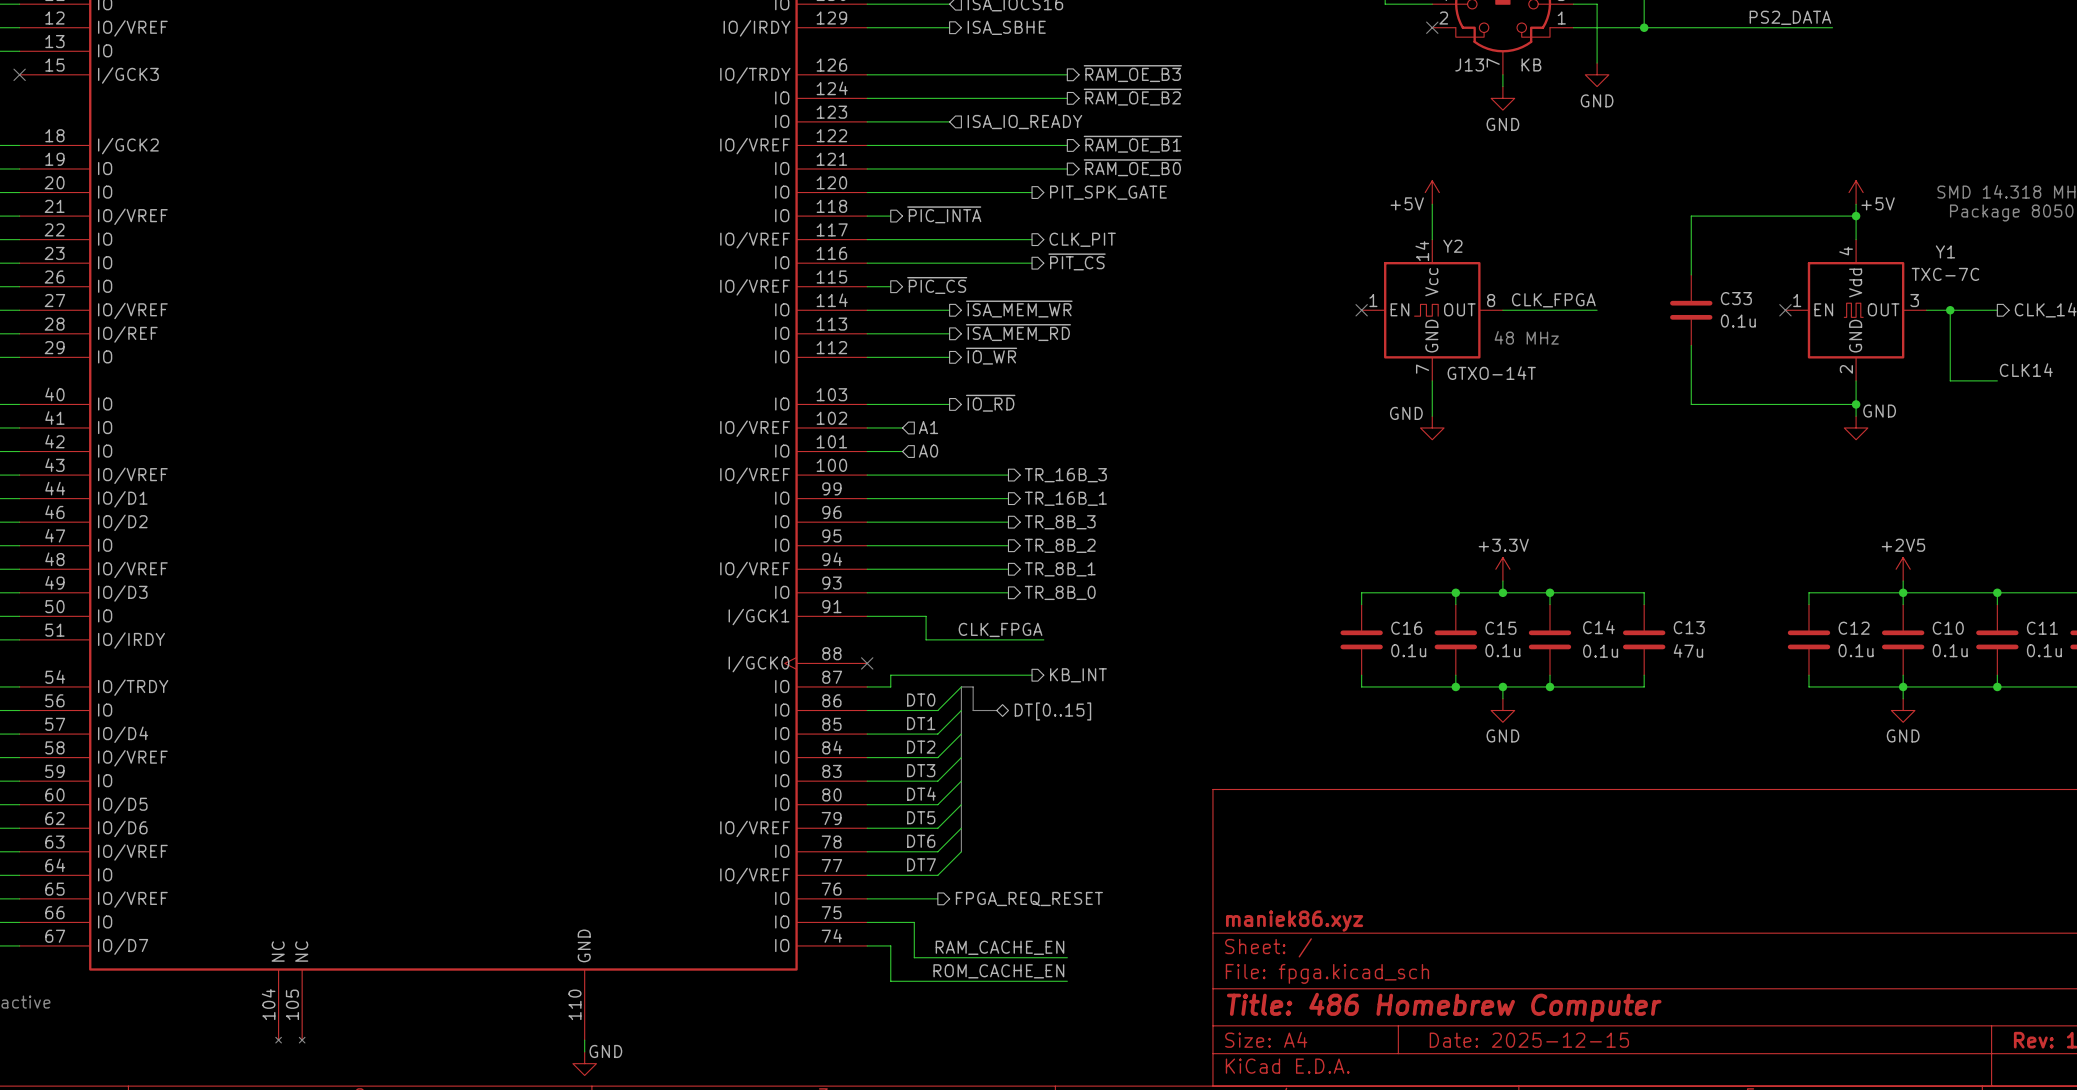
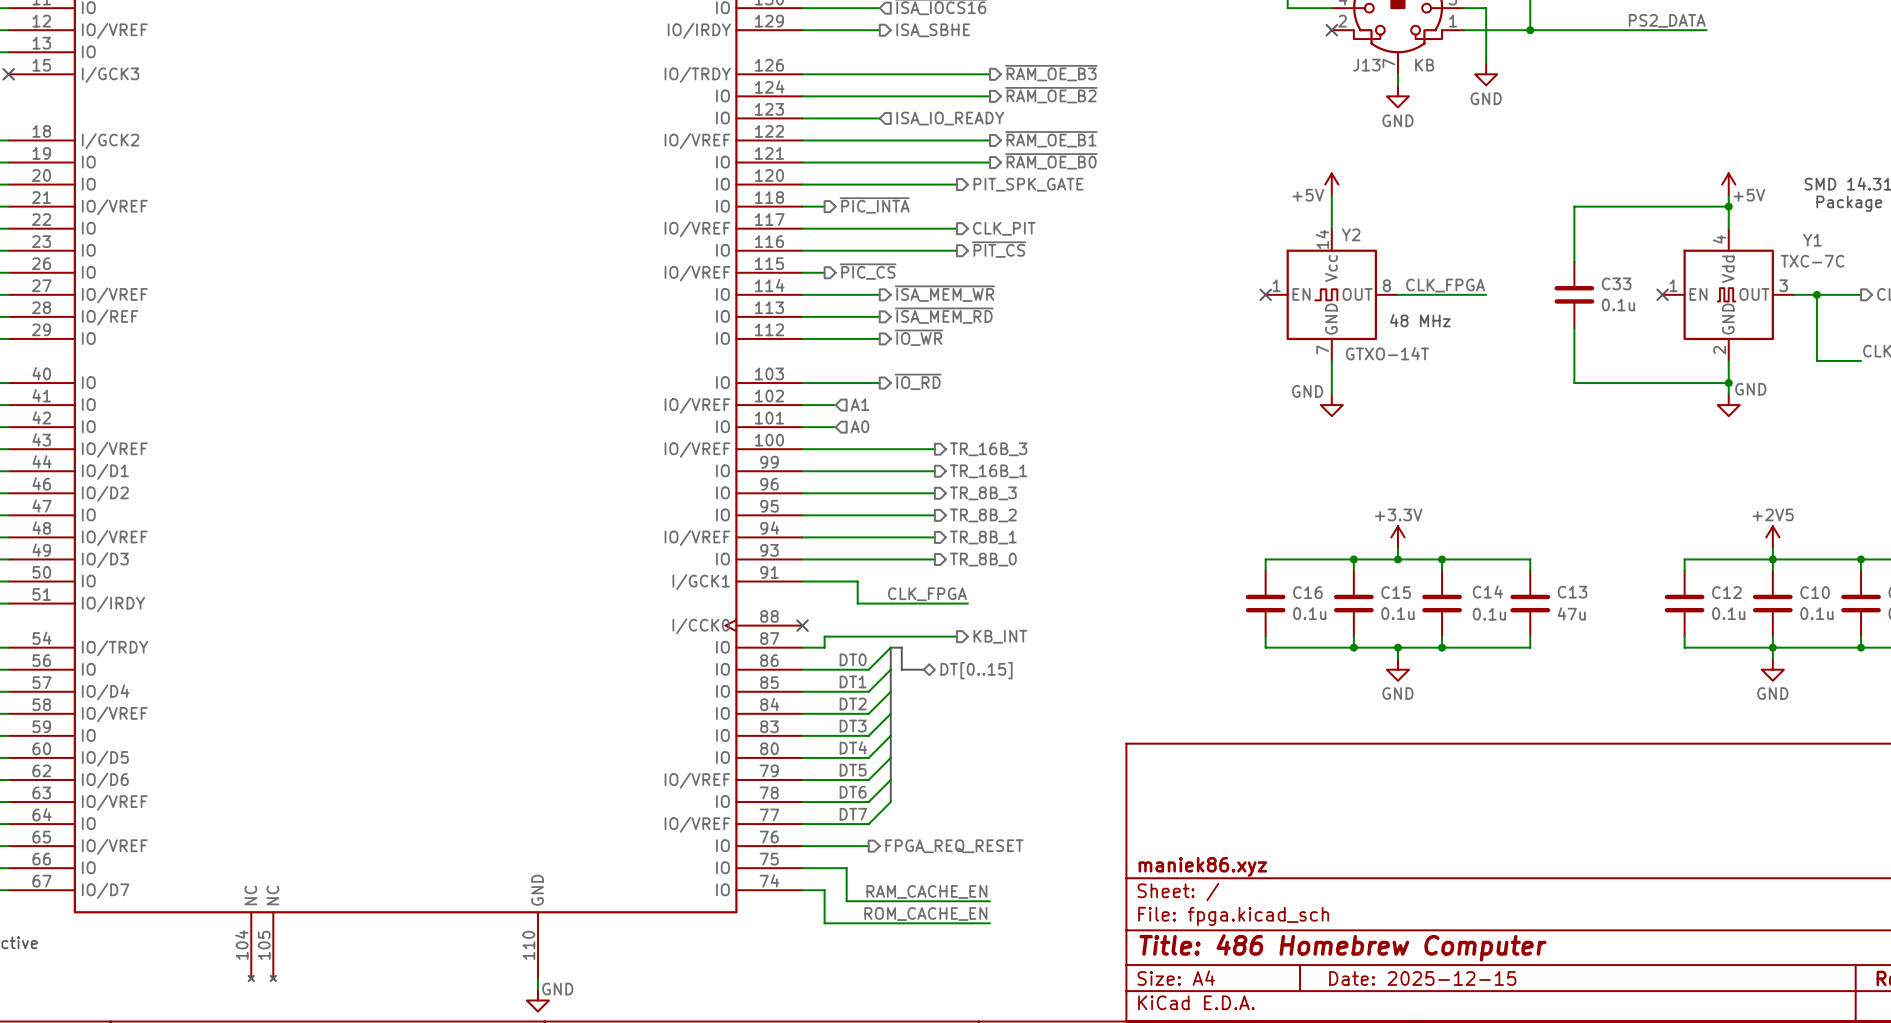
part pin name: I/GCK0 (758, 664) -> I/CCK0 (701, 626)

